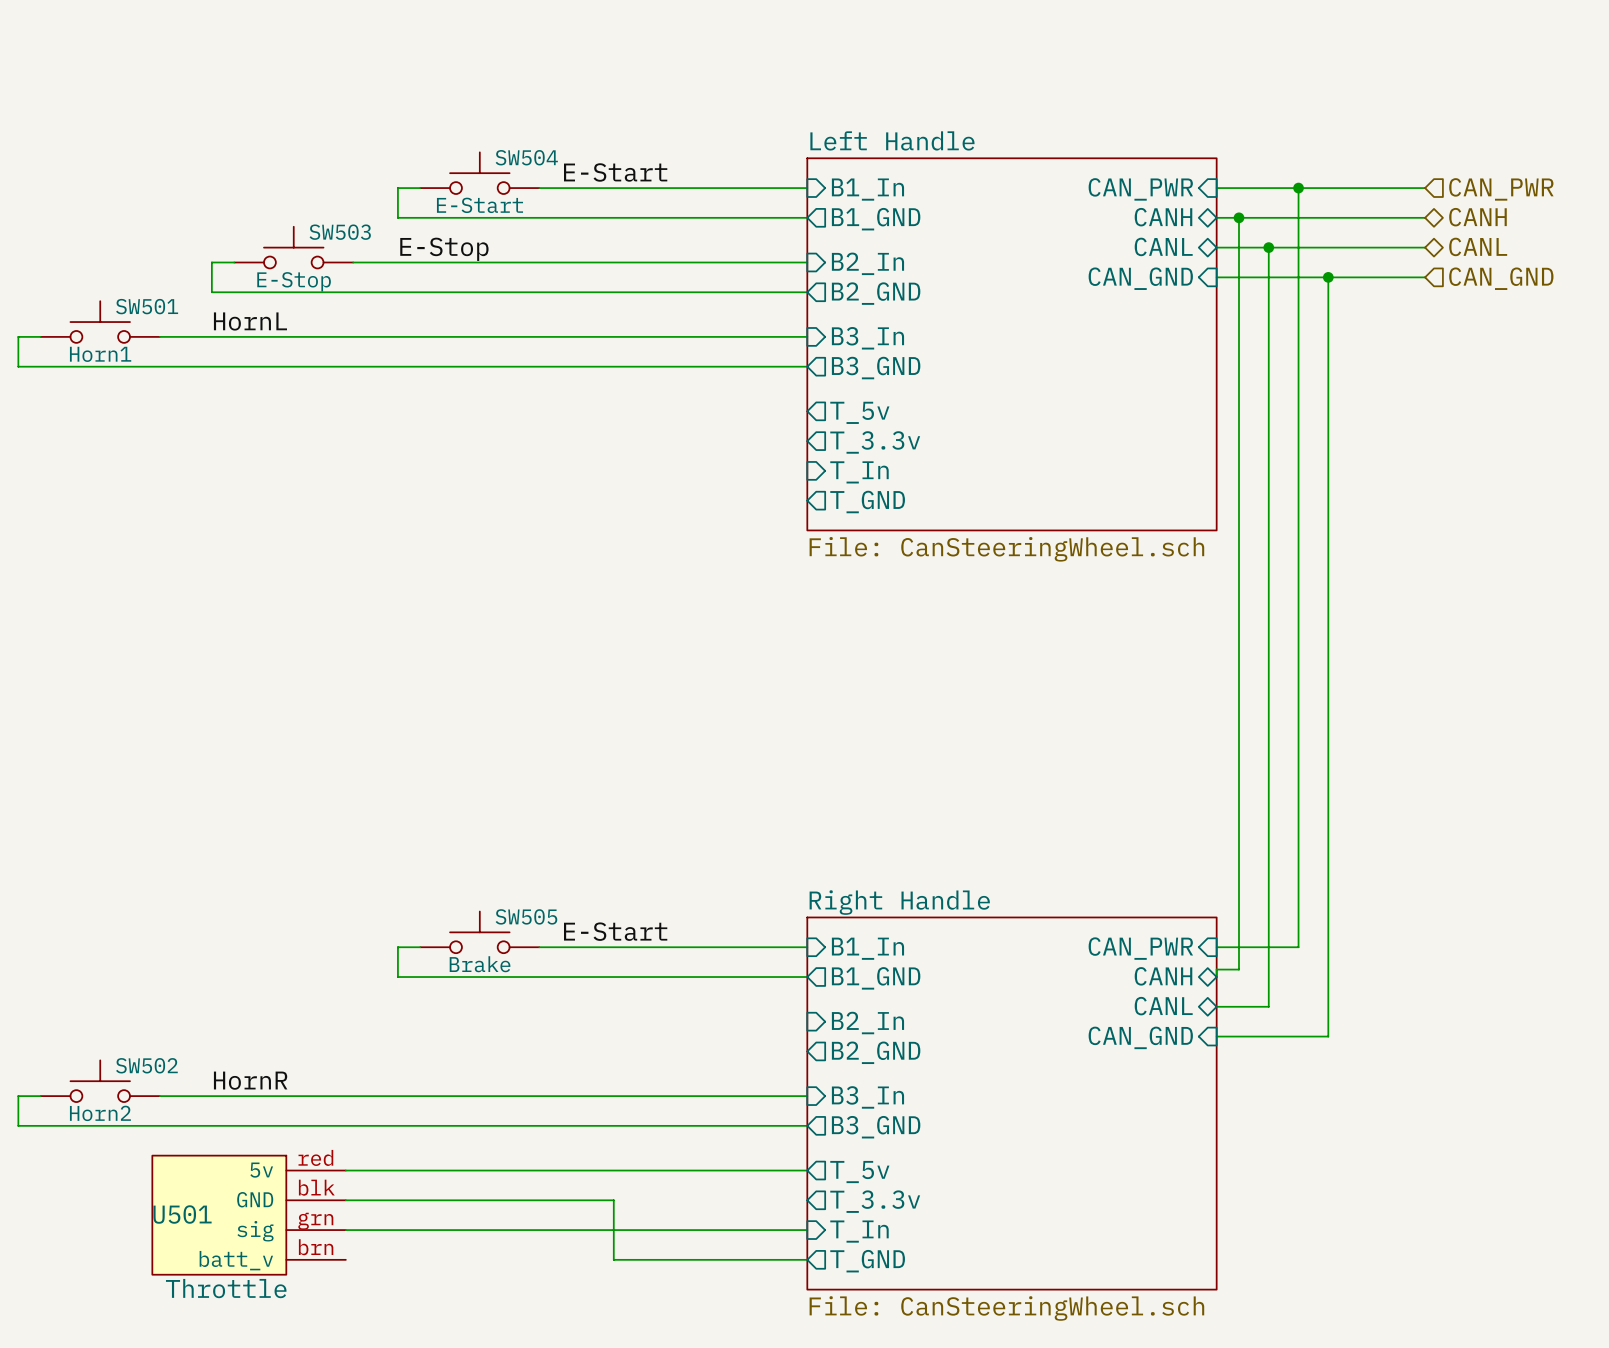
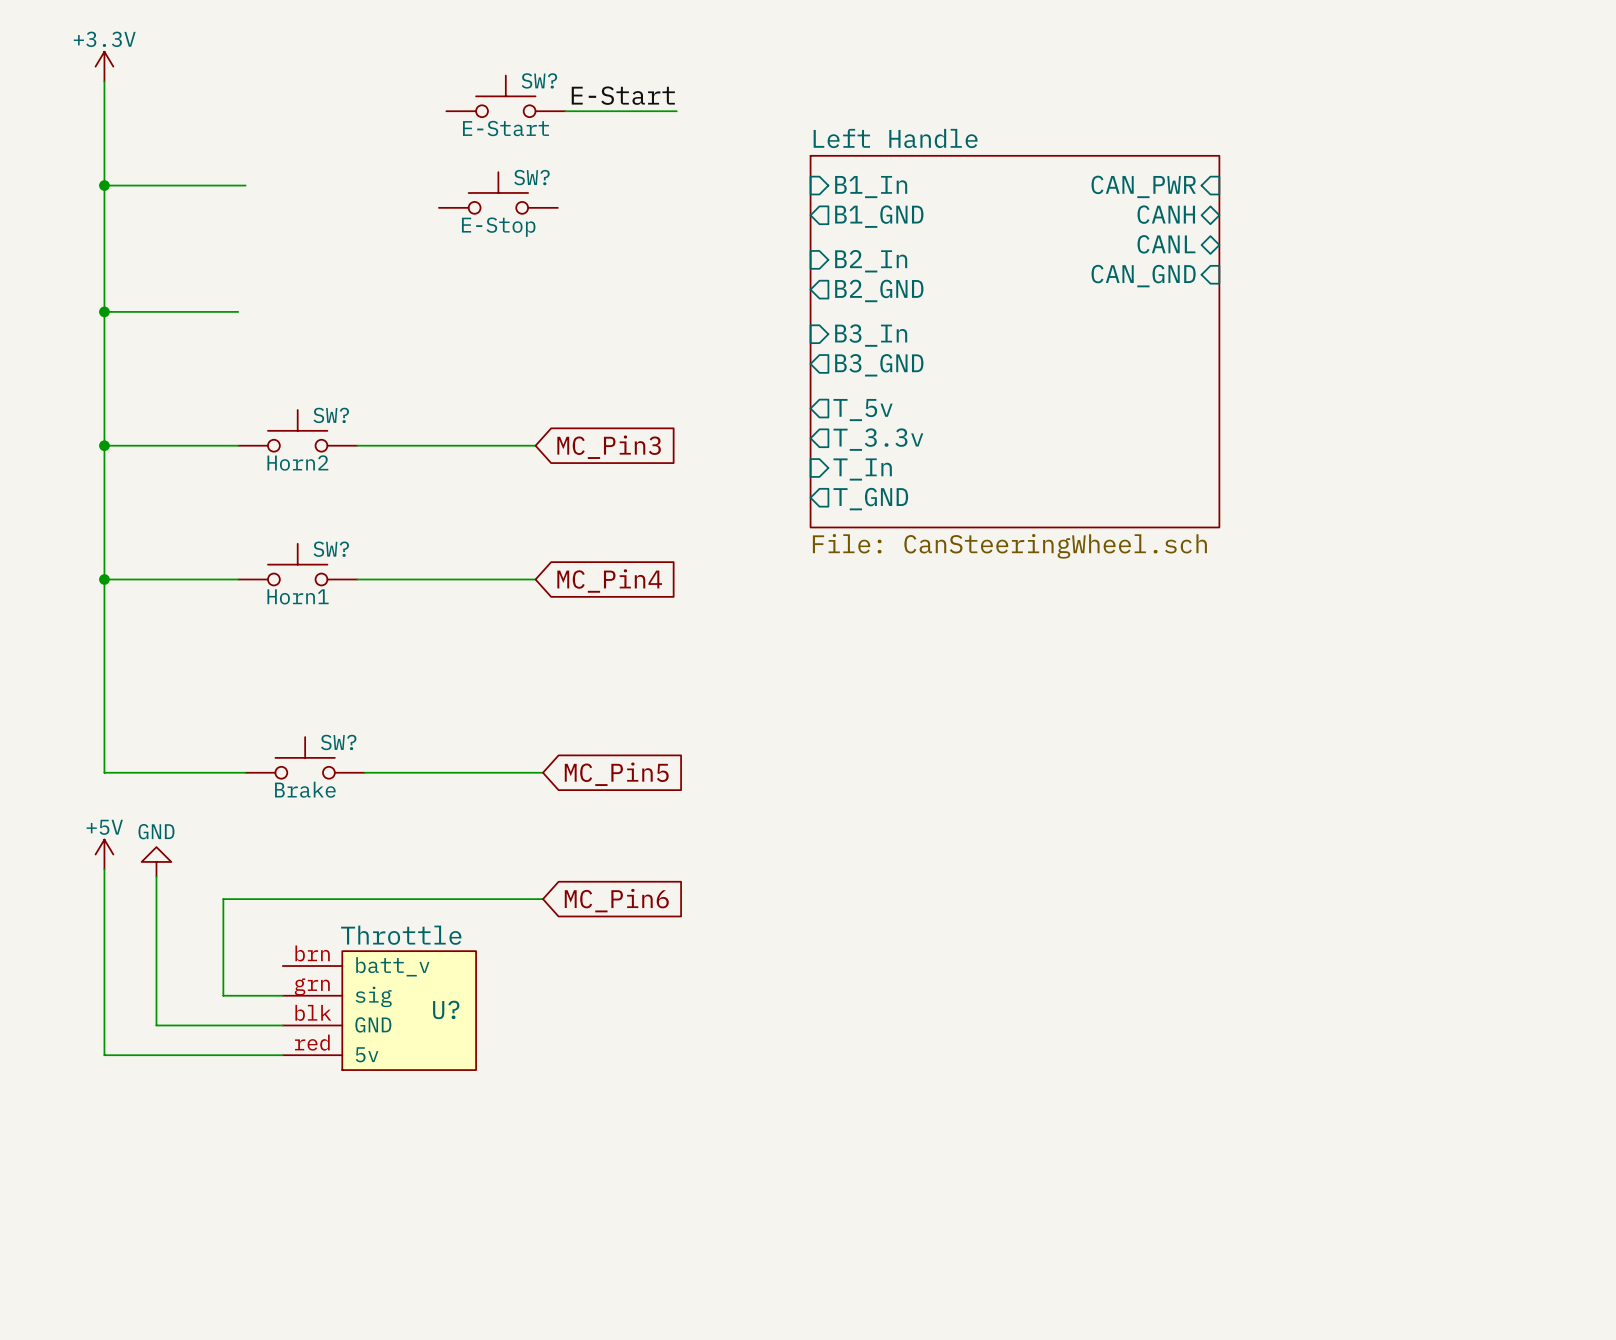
power symbol: none -> +3.3V (104, 66)
wire: none -> (104, 81) (104, 772) (245, 772)
SW?: none -> E-Start (505, 96)
wire: none -> (565, 111) (676, 111)
label position: E-Start (615, 172) -> E-Start (623, 95)
SW504: E-Start (479, 173) -> none
wire: none -> (104, 185) (245, 185)
junction: none -> (104, 185)
wire: (420, 188) (397, 188) (397, 217) (807, 217) -> none
wire: (539, 188) (807, 188) -> none
wire: (1216, 188) (1425, 188) -> none
wire: (1298, 188) (1298, 947) (1216, 947) -> none
junction: (1298, 188) -> none
hierarchical label: CAN_PWR (1501, 189) -> none
SW?: none -> E-Stop (498, 192)
wire: (1216, 217) (1425, 217) -> none
wire: (1238, 217) (1238, 969) (1216, 969) (1216, 977) -> none
junction: (1238, 217) -> none
hierarchical label: CANH (1477, 217) -> none
hierarchical label: CANL (1478, 246) -> none
SW503: E-Stop (293, 247) -> none
wire: (1216, 247) (1425, 247) -> none
wire: (1268, 247) (1268, 1006) (1216, 1006) -> none
junction: (1268, 247) -> none
label: E-Stop (444, 249) -> none
wire: (234, 262) (211, 262) (211, 292) (807, 292) -> none
wire: (353, 262) (807, 262) -> none
wire: (1216, 277) (1425, 277) -> none
wire: (1328, 277) (1328, 1036) (1216, 1036) -> none
junction: (1328, 277) -> none
hierarchical label: CAN_GND (1501, 278) -> none
wire: none -> (104, 311) (238, 311)
junction: none -> (104, 311)
label: HornL (250, 321) -> none
SW501: Horn1 (100, 322) -> none
wire: (40, 336) (18, 336) (18, 366) (807, 366) -> none
wire: (159, 336) (807, 336) -> none
SW?: none -> Horn2 (297, 430)
wire: none -> (104, 445) (238, 445)
junction: none -> (104, 445)
wire: none -> (357, 445) (535, 445)
global label: none -> MC_Pin3 (609, 447)
SW?: none -> Horn1 (297, 564)
wire: none -> (104, 579) (238, 579)
junction: none -> (104, 579)
wire: none -> (357, 579) (535, 579)
global label: none -> MC_Pin4 (609, 581)
SW?: none -> Brake (305, 757)
wire: none -> (364, 772) (542, 772)
global label: none -> MC_Pin5 (616, 774)
power symbol: none -> +5V (104, 854)
power symbol: none -> GND (156, 861)
wire: none -> (104, 869) (104, 1055) (282, 1055)
wire: none -> (156, 876) (156, 1025) (282, 1025)
wire: none -> (542, 899) (223, 899) (223, 995) (282, 995)
global label: none -> MC_Pin6 (616, 900)
label: E-Start (615, 931) -> none
SW505: Brake (479, 932) -> none
wire: (420, 947) (397, 947) (397, 977) (807, 977) -> none
wire: (539, 947) (807, 947) -> none
sheet pin: B1_In (867, 948) -> none
sheet pin: CAN_PWR (1140, 948) -> none
sheet pin: CANH (1163, 976) -> none
sheet pin: B1_GND (876, 978) -> none
sheet pin: CANL (1163, 1006) -> none
U?: none -> Throttle (379, 1010)
sheet pin: B2_In (867, 1023) -> none
sheet pin: CAN_GND (1140, 1037) -> none
sheet pin: B2_GND (876, 1052) -> none
label: HornR (250, 1080) -> none
SW502: Horn2 (100, 1081) -> none
wire: (40, 1096) (18, 1096) (18, 1125) (807, 1125) -> none
wire: (159, 1096) (807, 1096) -> none
sheet pin: B3_In (867, 1097) -> none
sheet Right Handle: File: CanSteeringWheel.sch (1011, 1103) -> none
sheet pin: B3_GND (876, 1127) -> none
wire: (345, 1170) (807, 1170) -> none
sheet pin: T_5v (859, 1172) -> none
wire: (345, 1200) (613, 1200) (613, 1259) (807, 1259) -> none
sheet pin: T_3.3v (875, 1201) -> none
U501: Throttle (249, 1215) -> none
wire: (345, 1230) (807, 1230) -> none
sheet pin: T_In (859, 1231) -> none
sheet pin: T_GND (867, 1261) -> none

